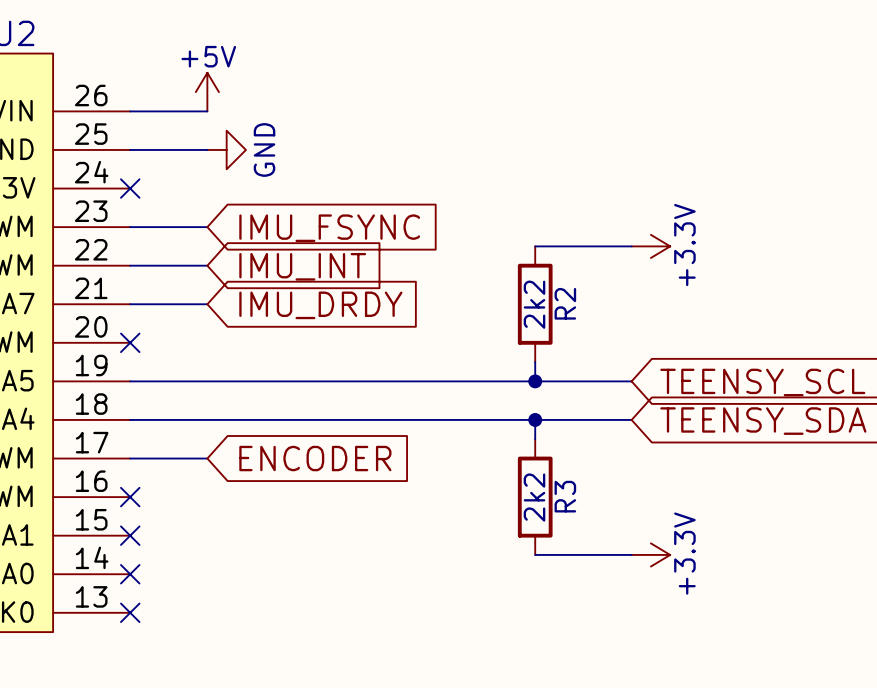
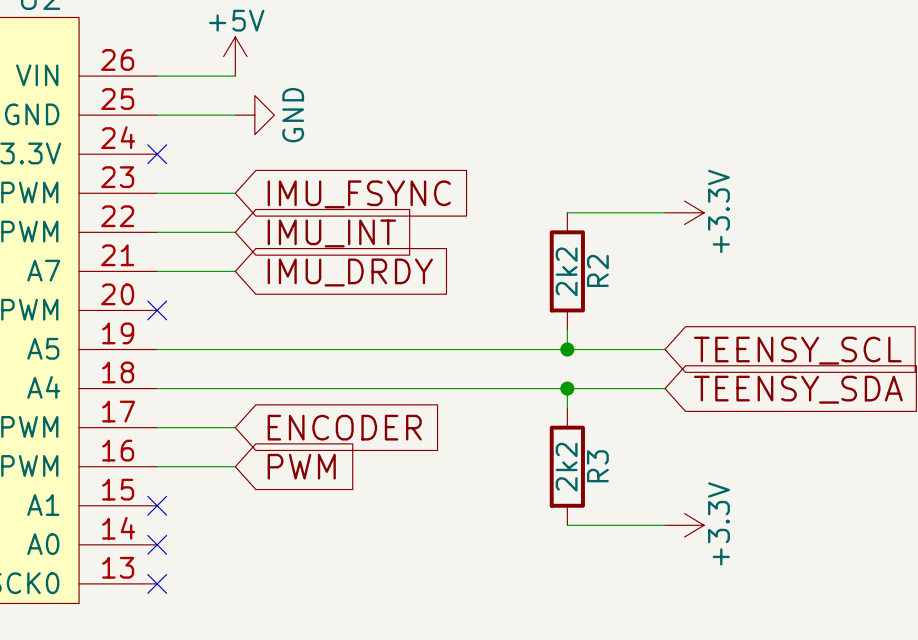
wire: none -> (157, 466) (235, 466)
no-connect mark: (130, 497) -> none
global label: none -> PWM (301, 466)

